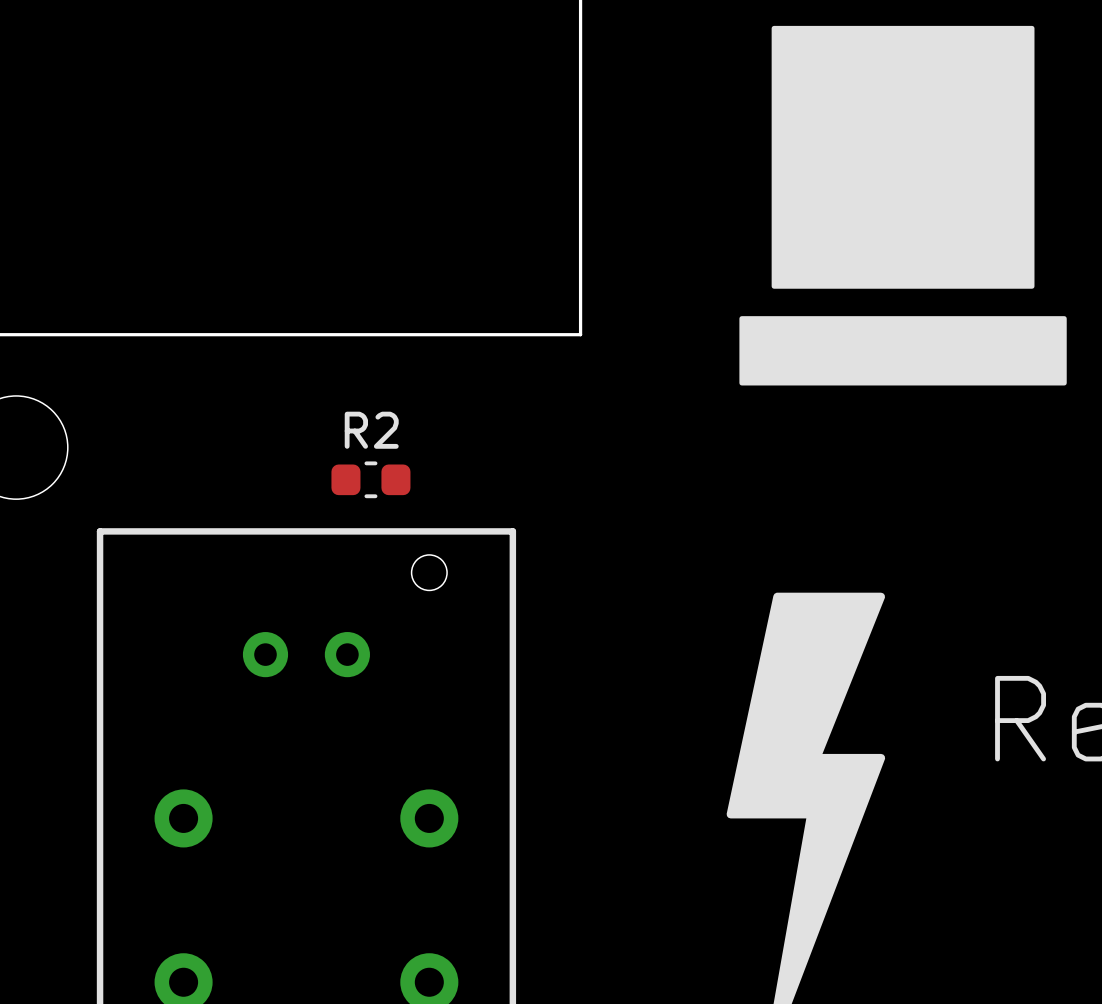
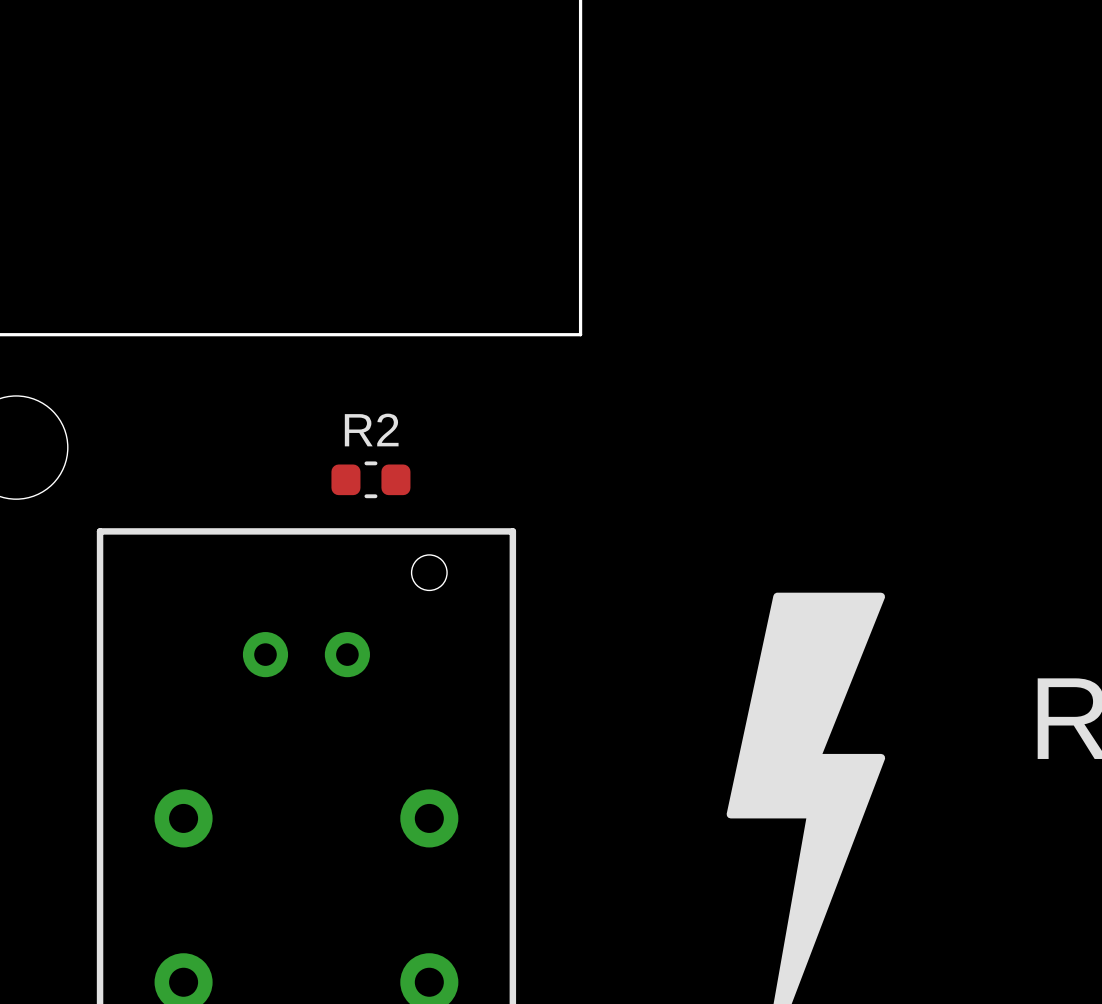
drawing: [739, 25, 1067, 386] -> none

